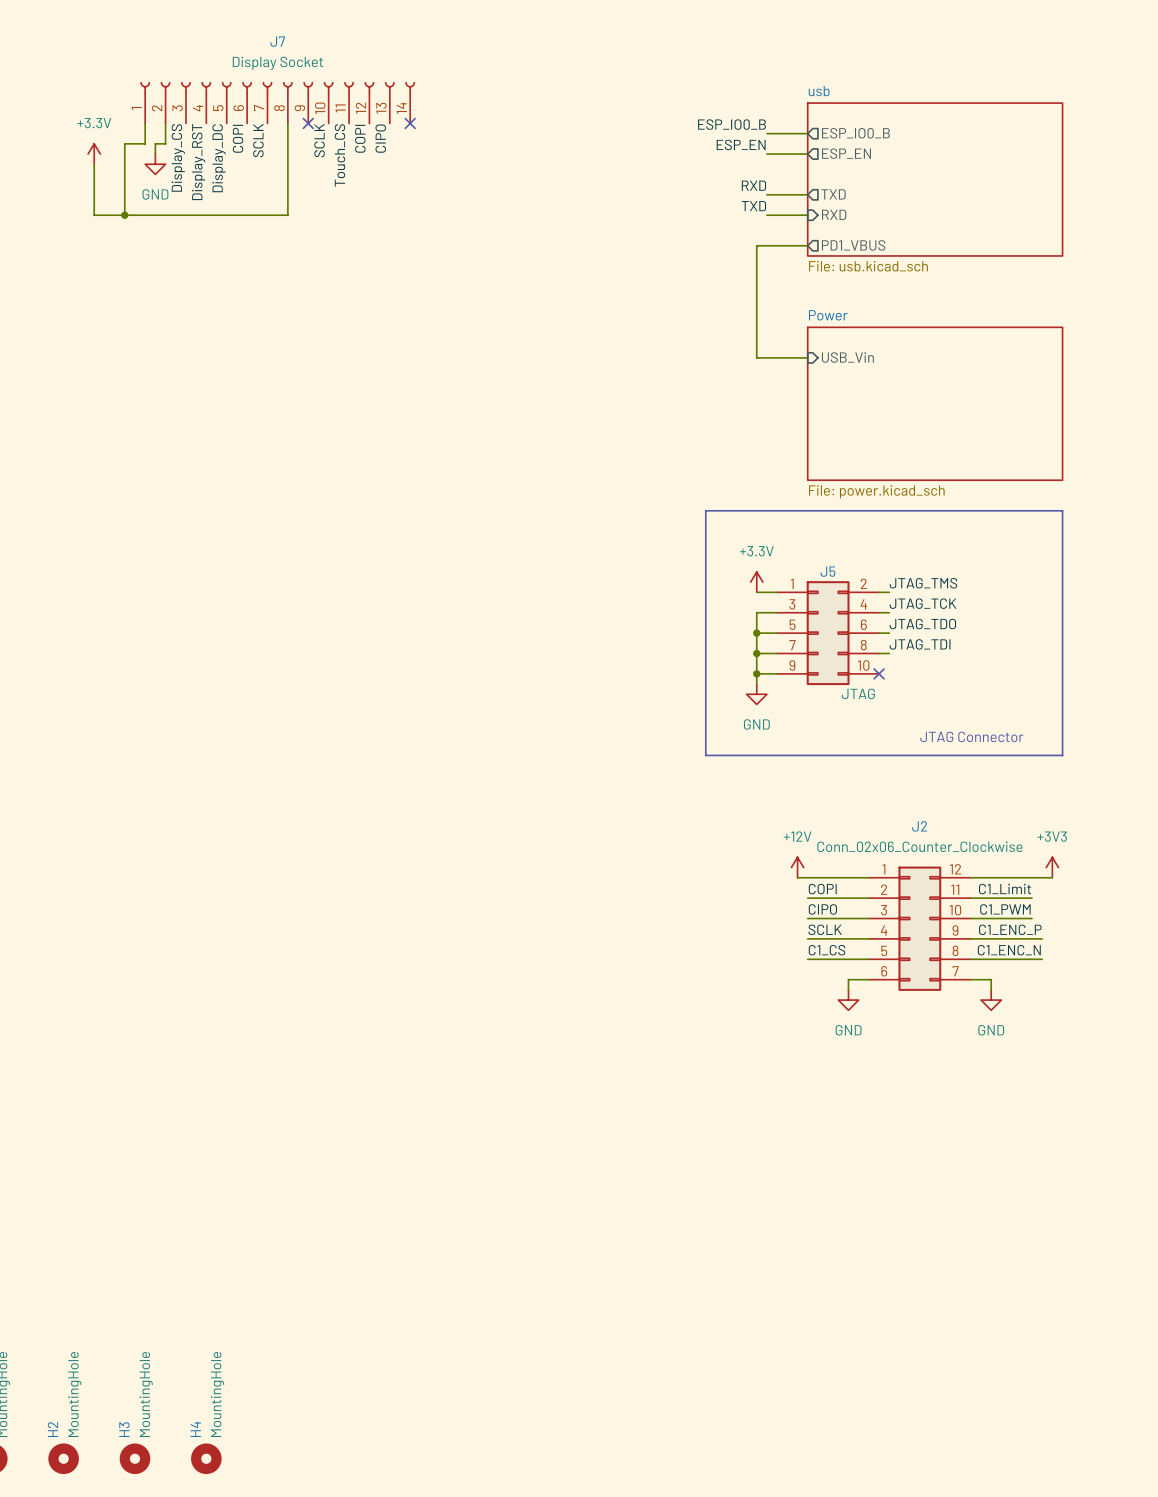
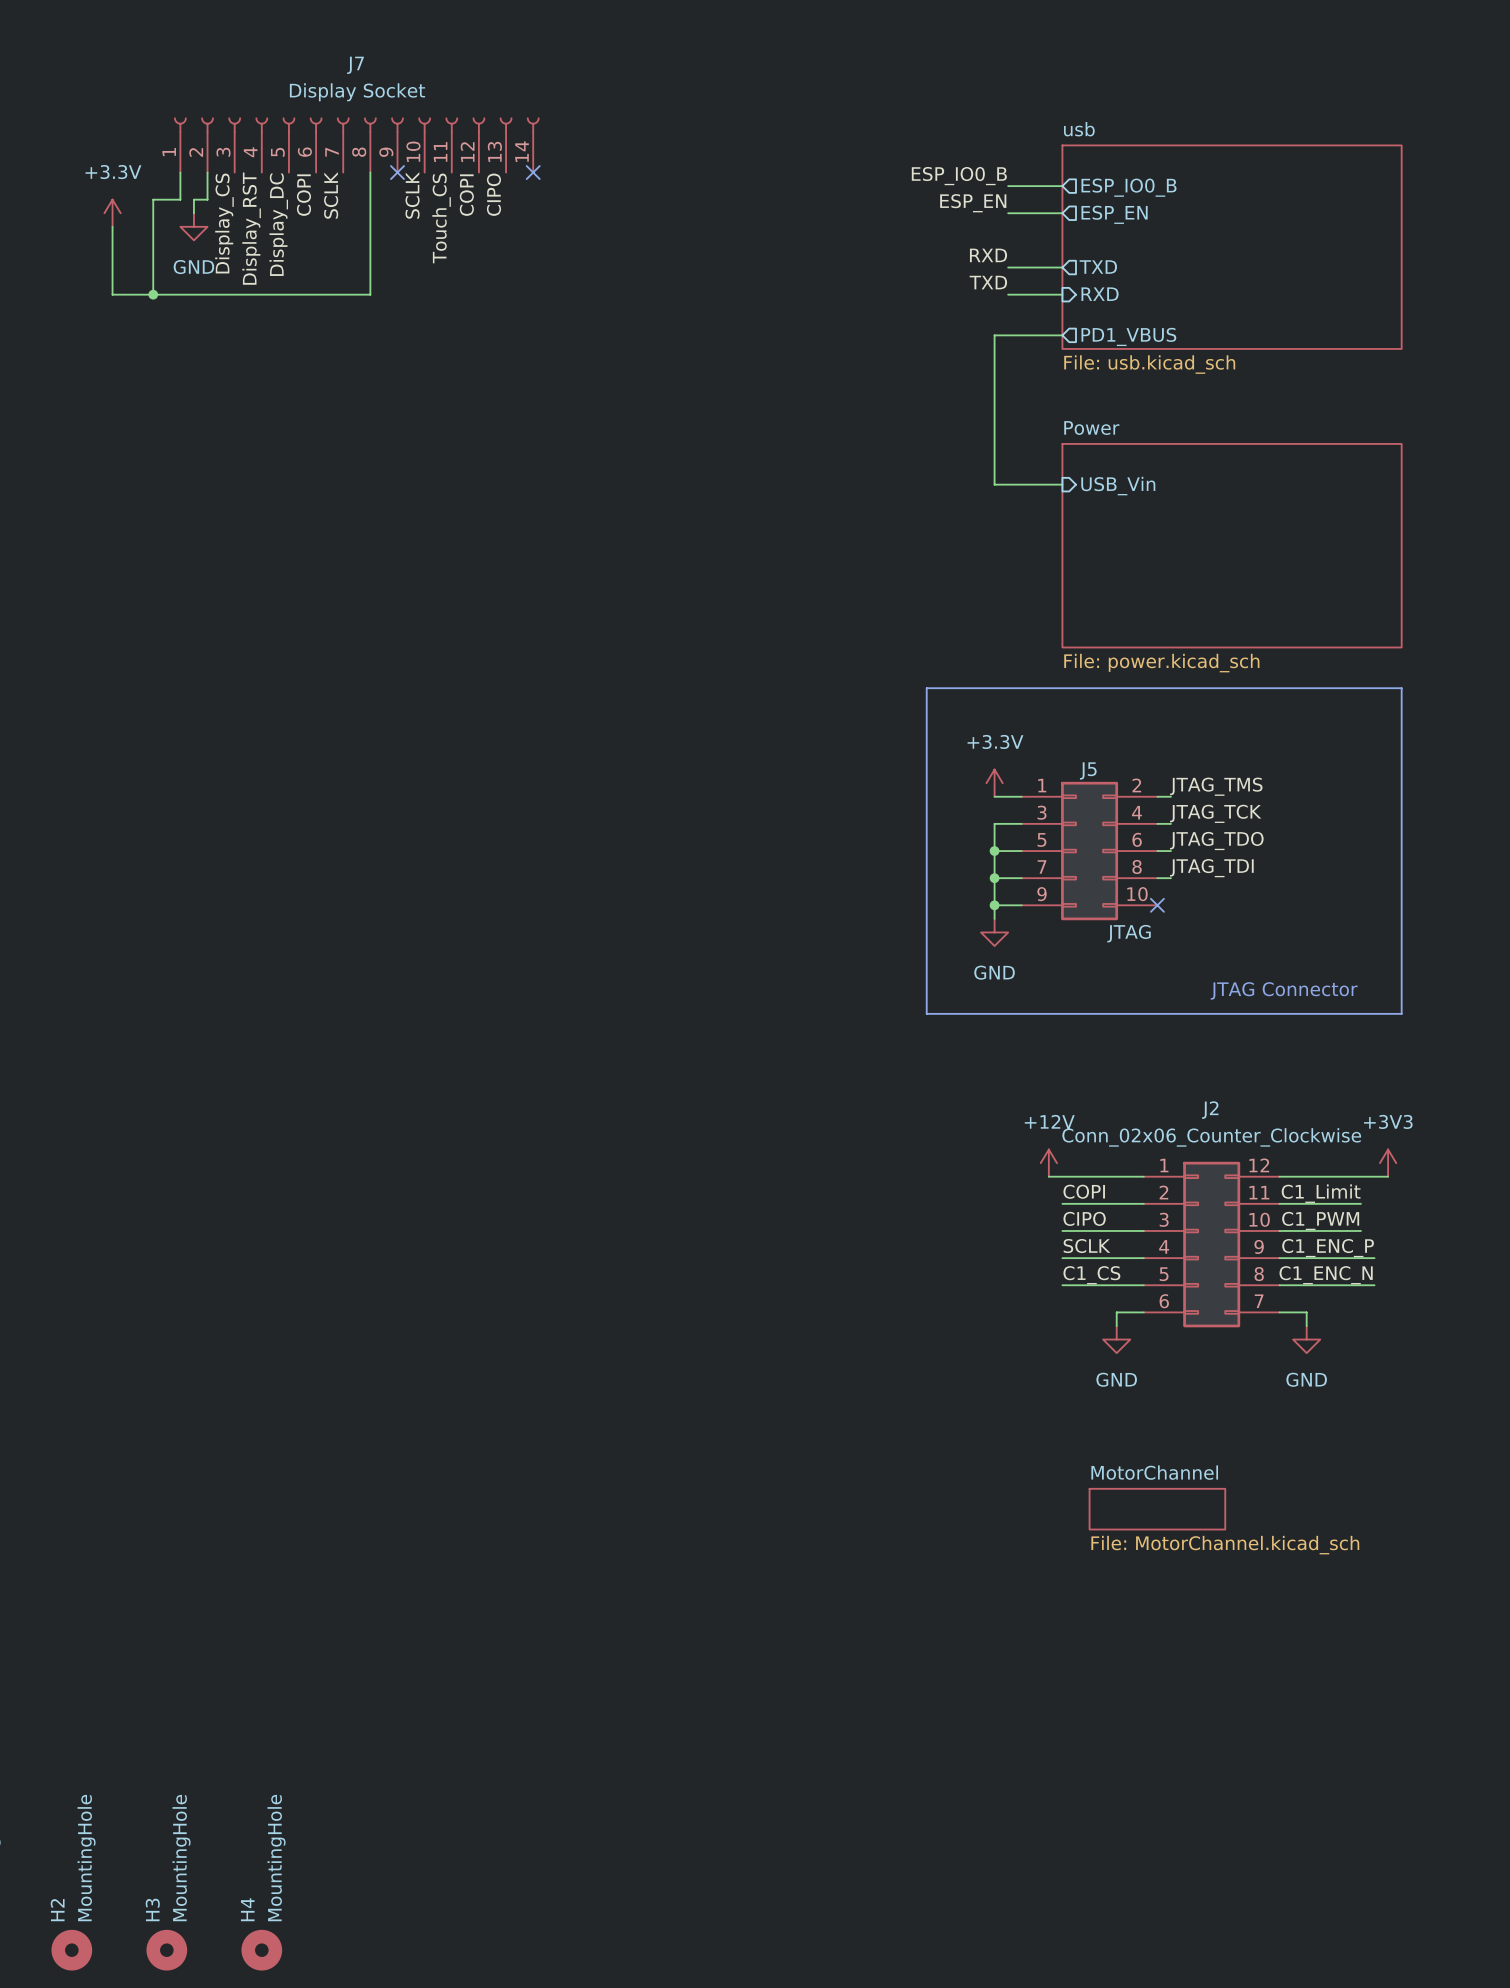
sheet MotorChannel: none -> File: MotorChannel.kicad_sch (1157, 1509)

